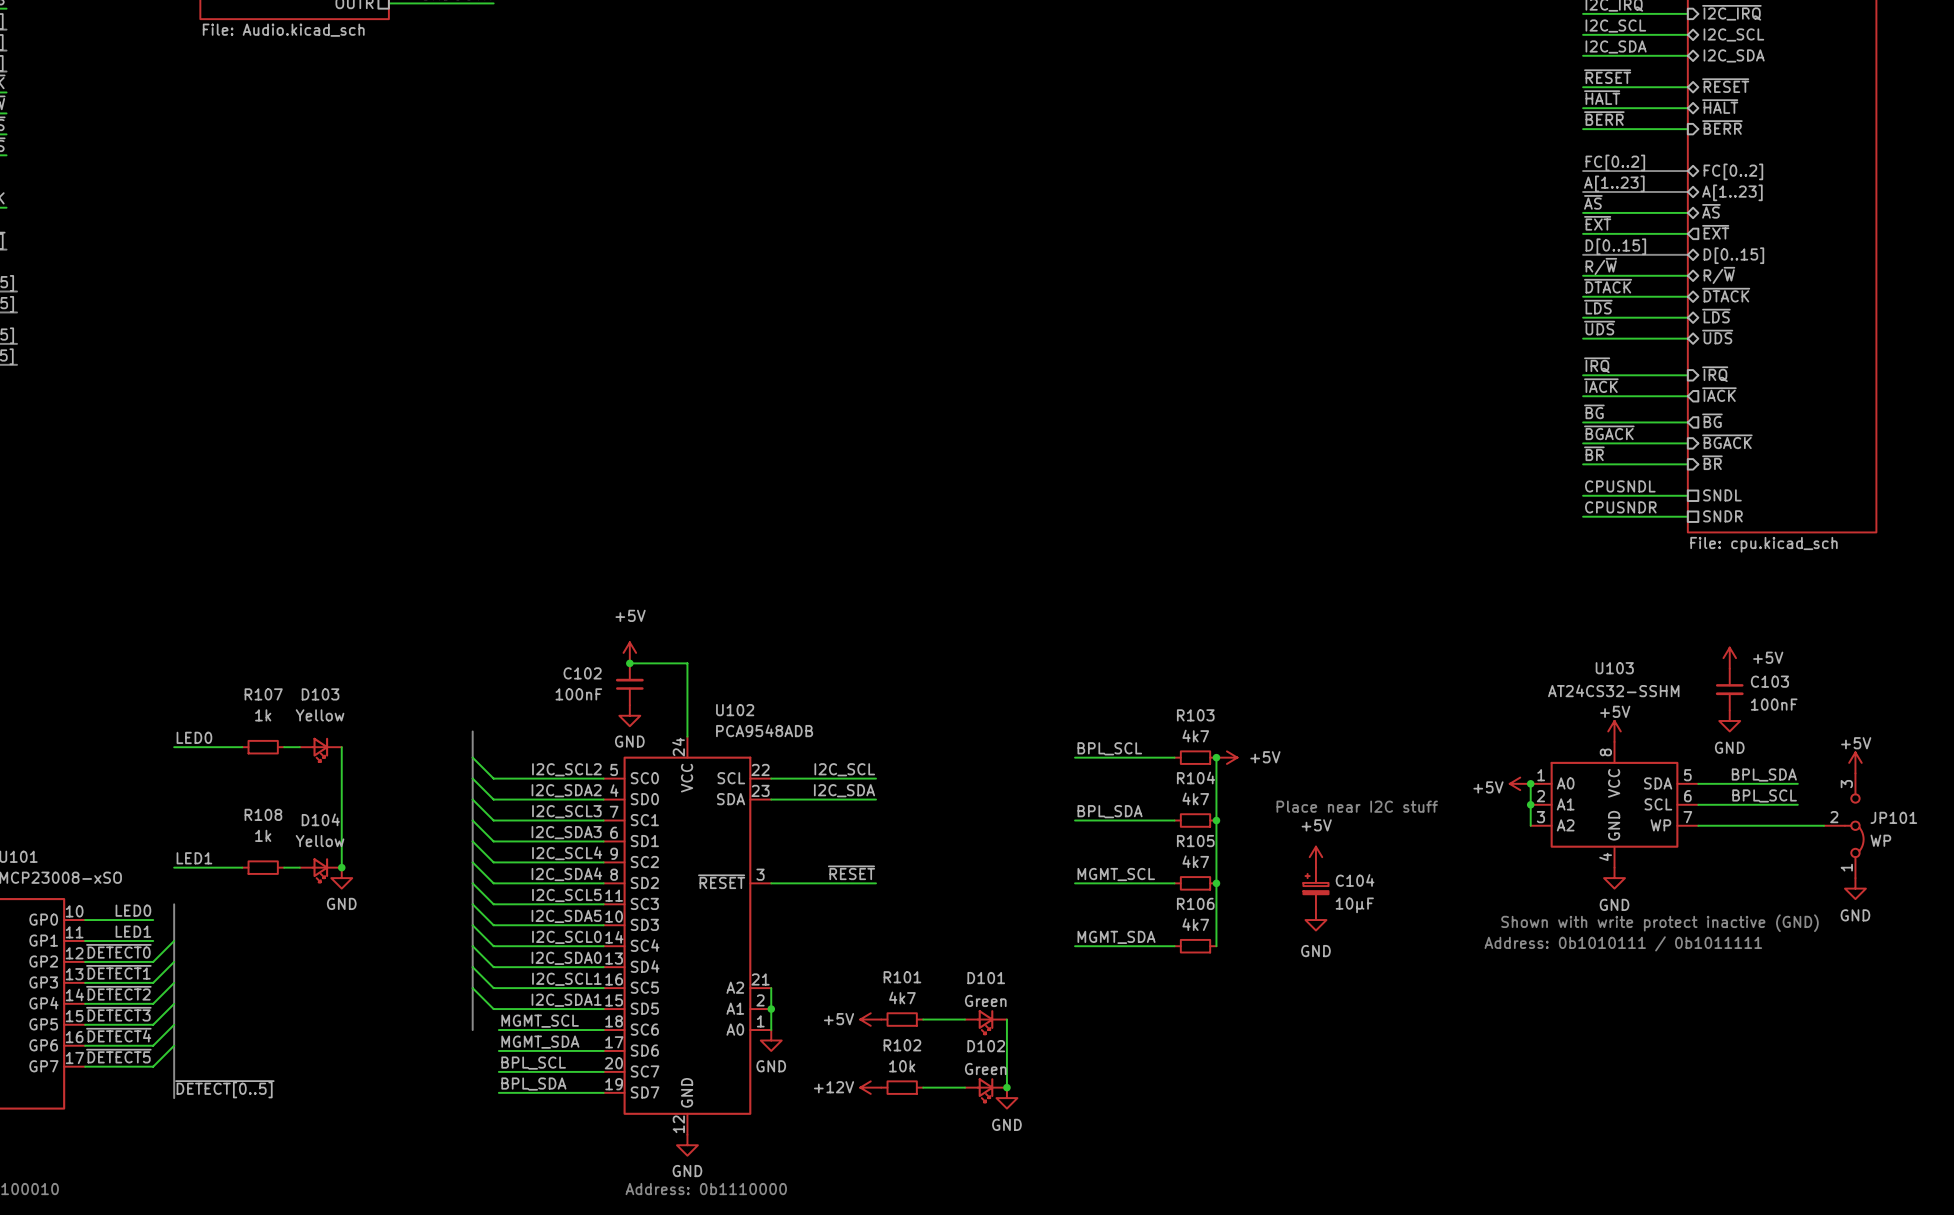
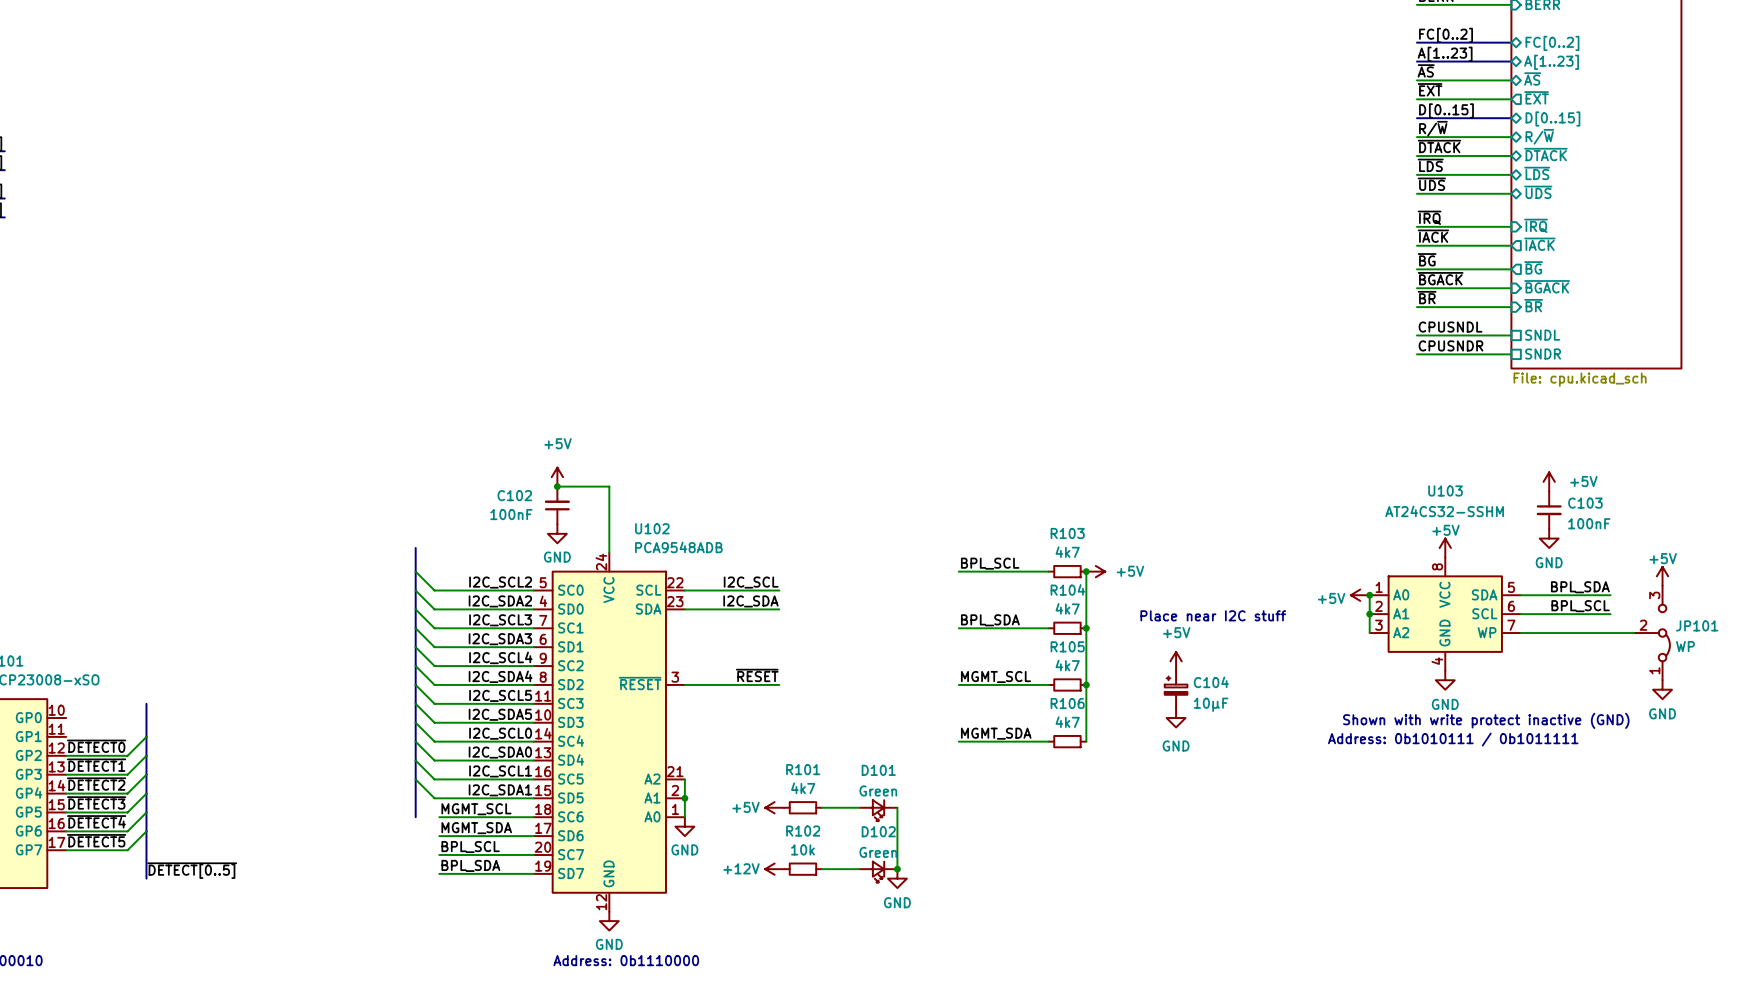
label: LED0 (194, 737) -> none
wire: (174, 747) (242, 747) -> none
R107: 1k (263, 747) -> none
wire: (284, 747) (299, 747) -> none
wire: (341, 747) (341, 867) -> none
D103: Yellow (320, 749) -> none
label: LED1 (194, 858) -> none
wire: (174, 867) (242, 867) -> none
R108: 1k (263, 867) -> none
wire: (284, 867) (299, 867) -> none
junction: (341, 867) -> none
D104: Yellow (320, 870) -> none
power symbol: GND (341, 878) -> none
label: LED0 (133, 910) -> none
wire: (85, 920) (153, 920) -> none
label: LED1 (133, 931) -> none
wire: (85, 940) (153, 940) -> none

